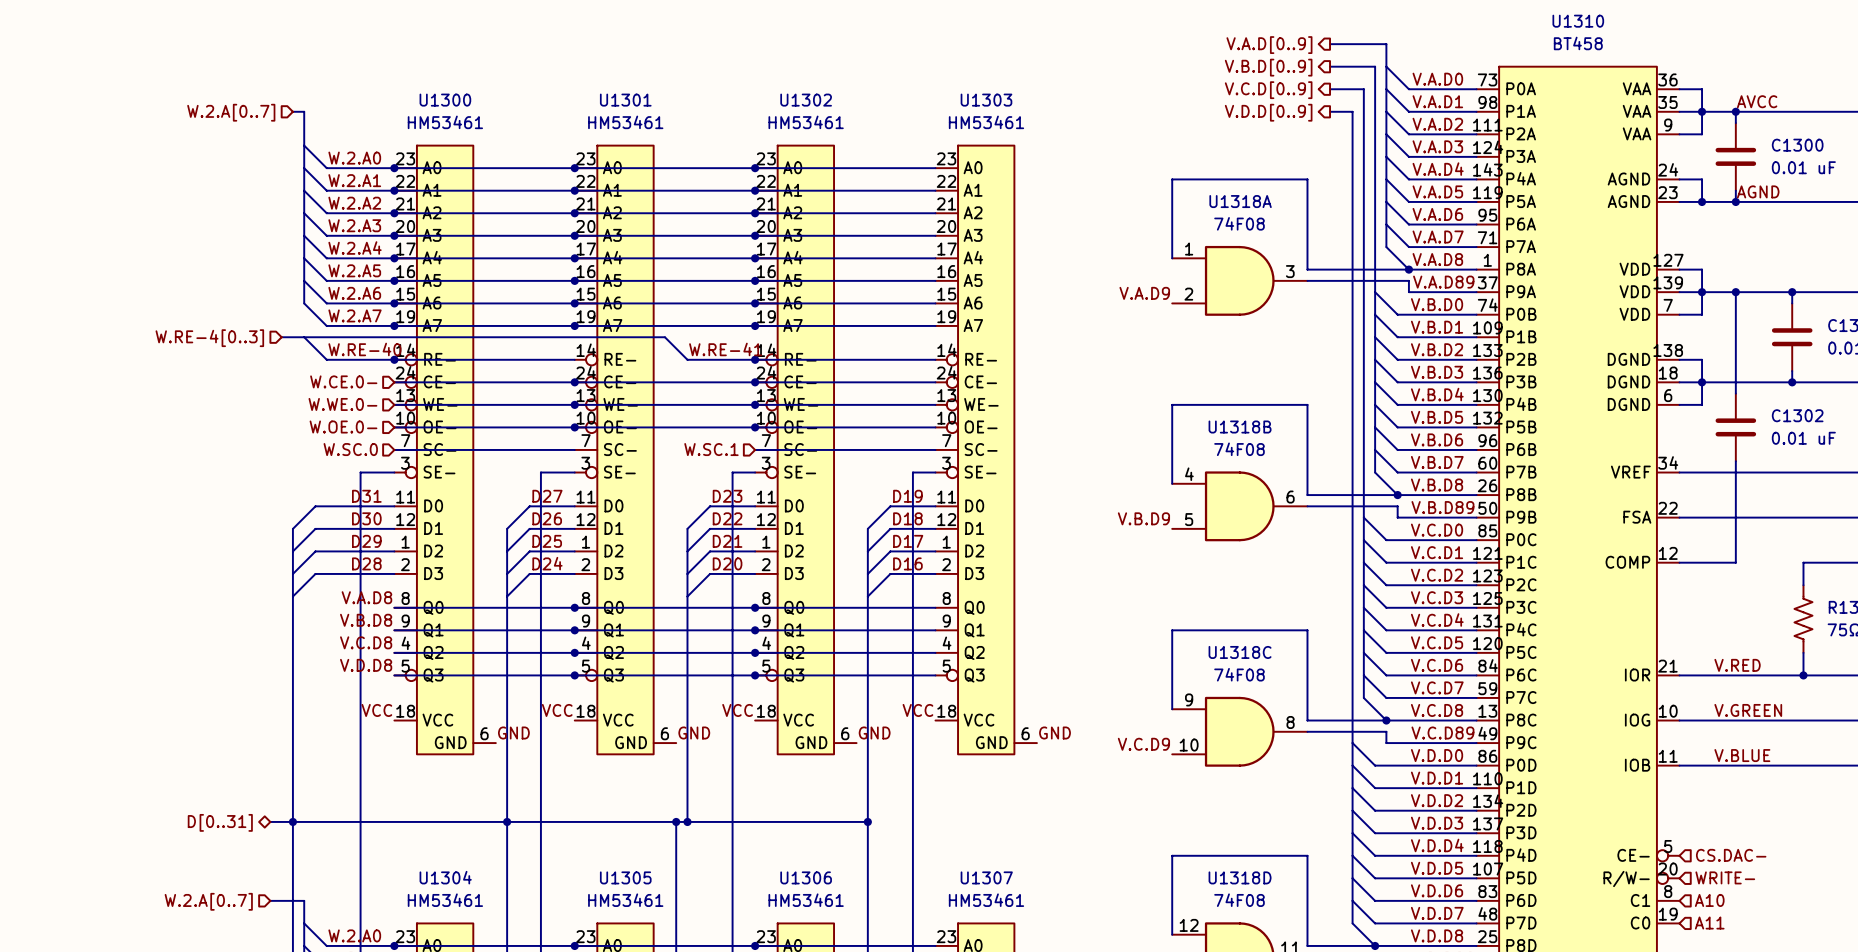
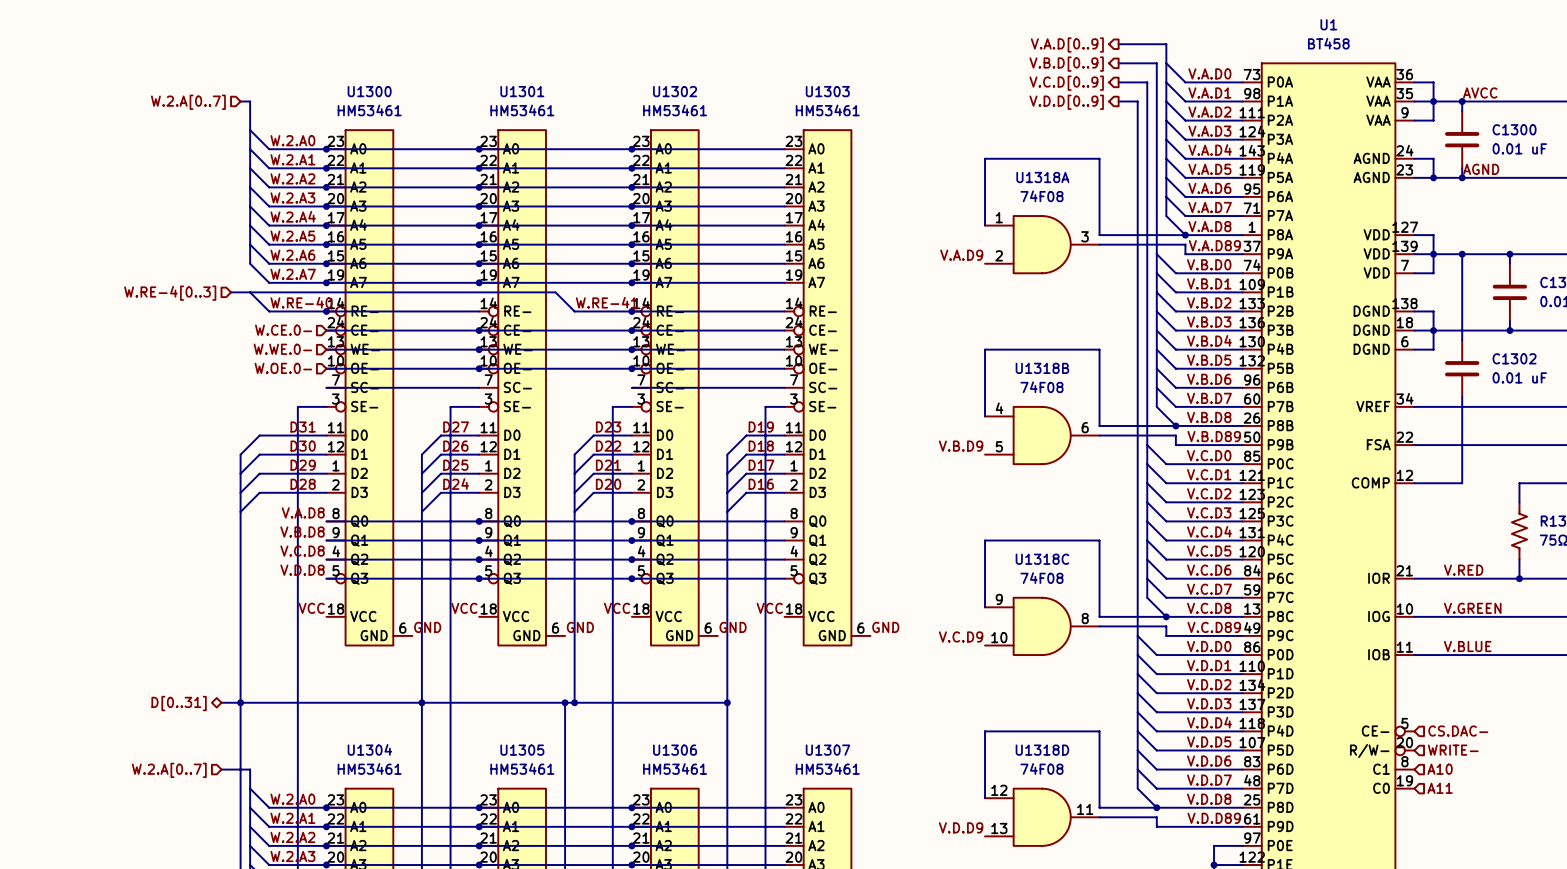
U1310 name: U1310 (1578, 21) -> U1 (1328, 24)
hierarchical label: W.SC.0 (350, 449) -> none
hierarchical label: W.SC.1 (711, 449) -> none

